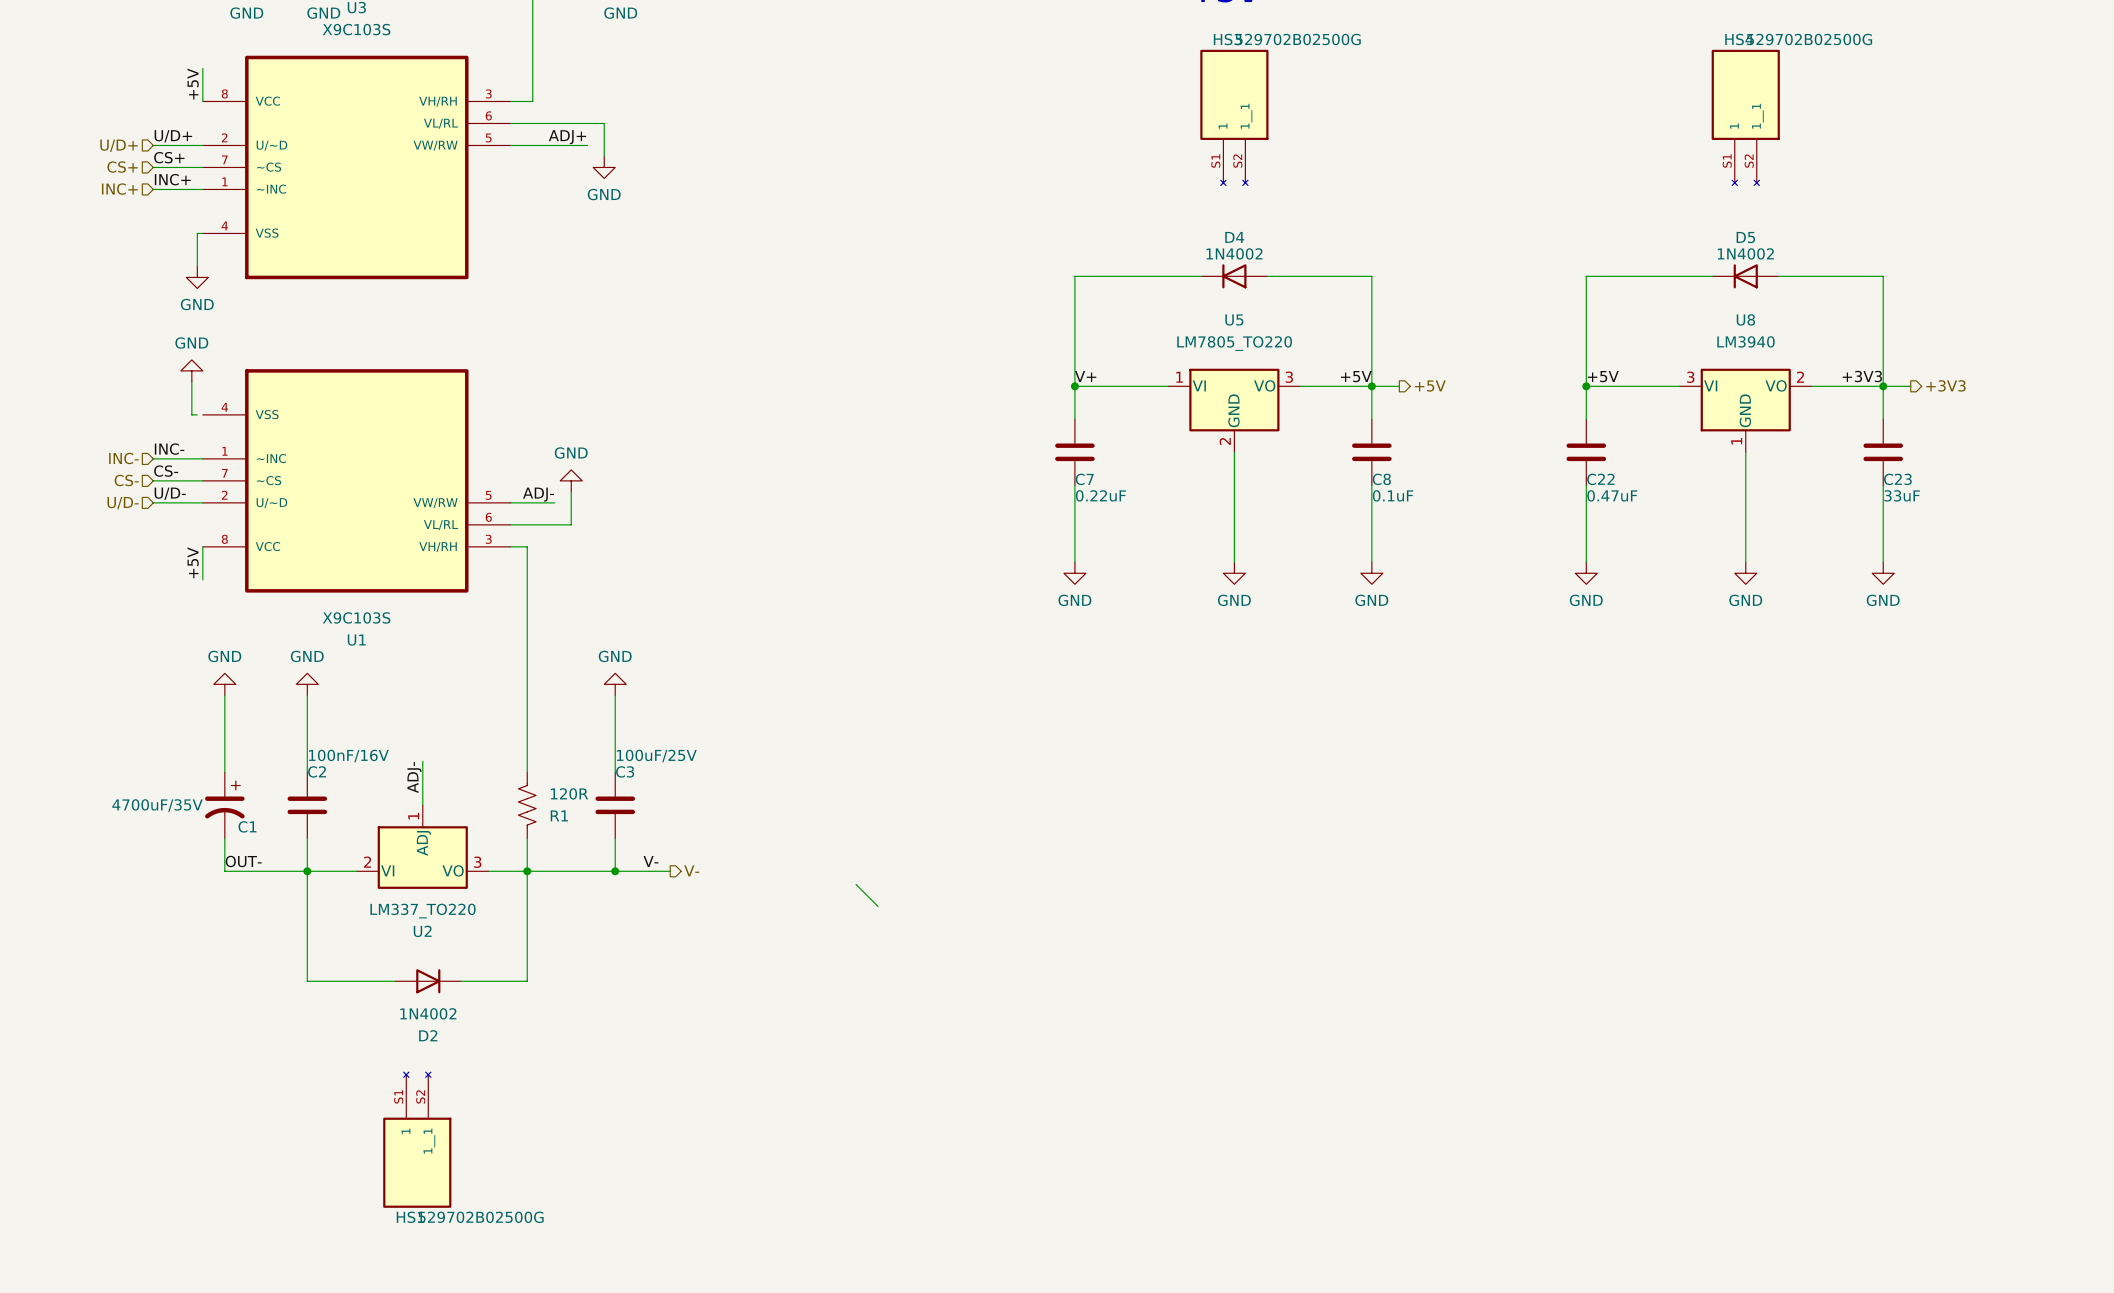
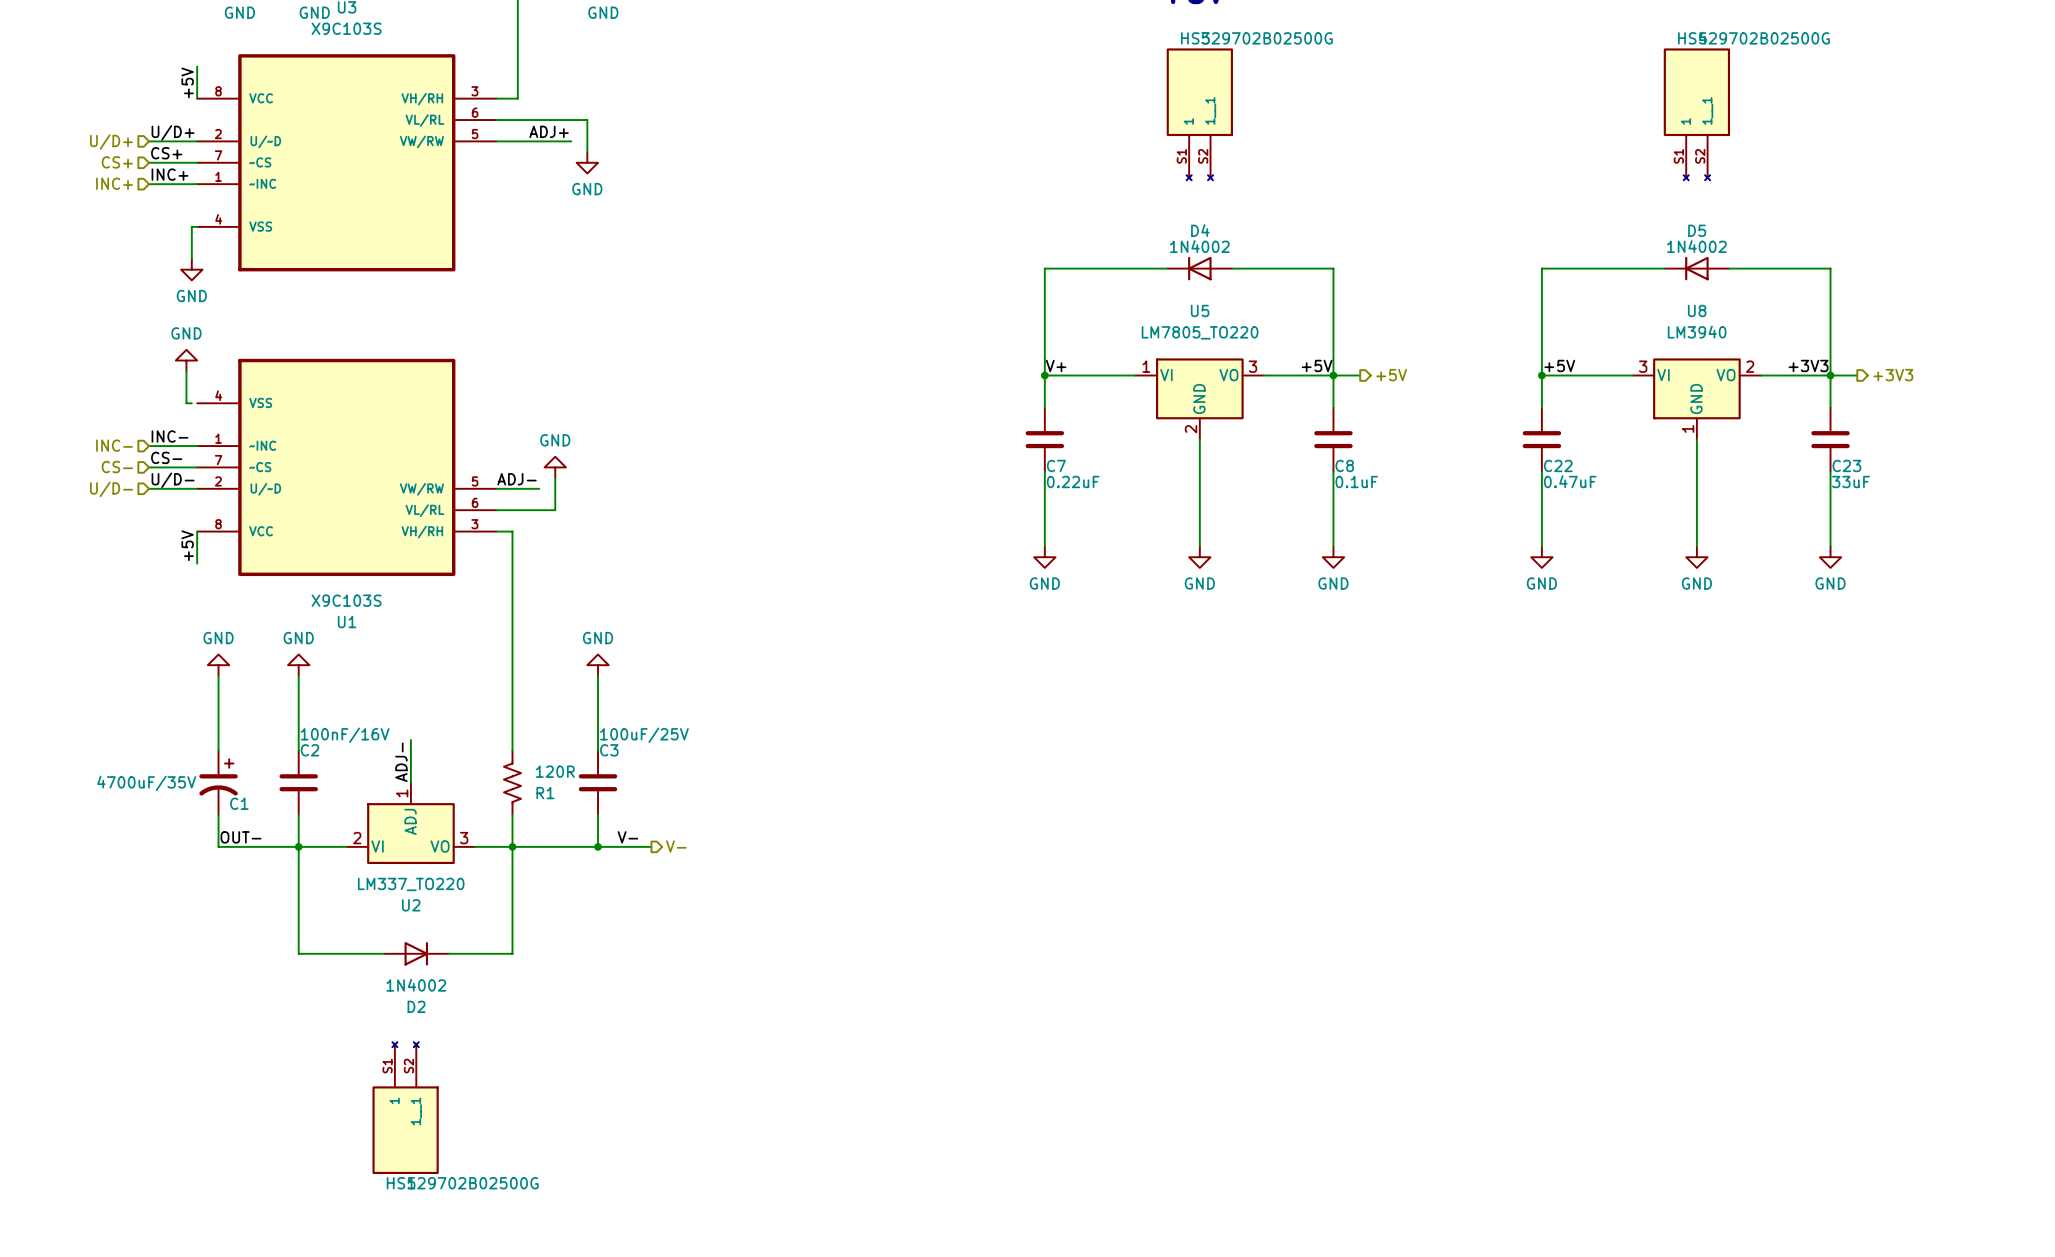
wire: (856, 884) (878, 906) -> none

